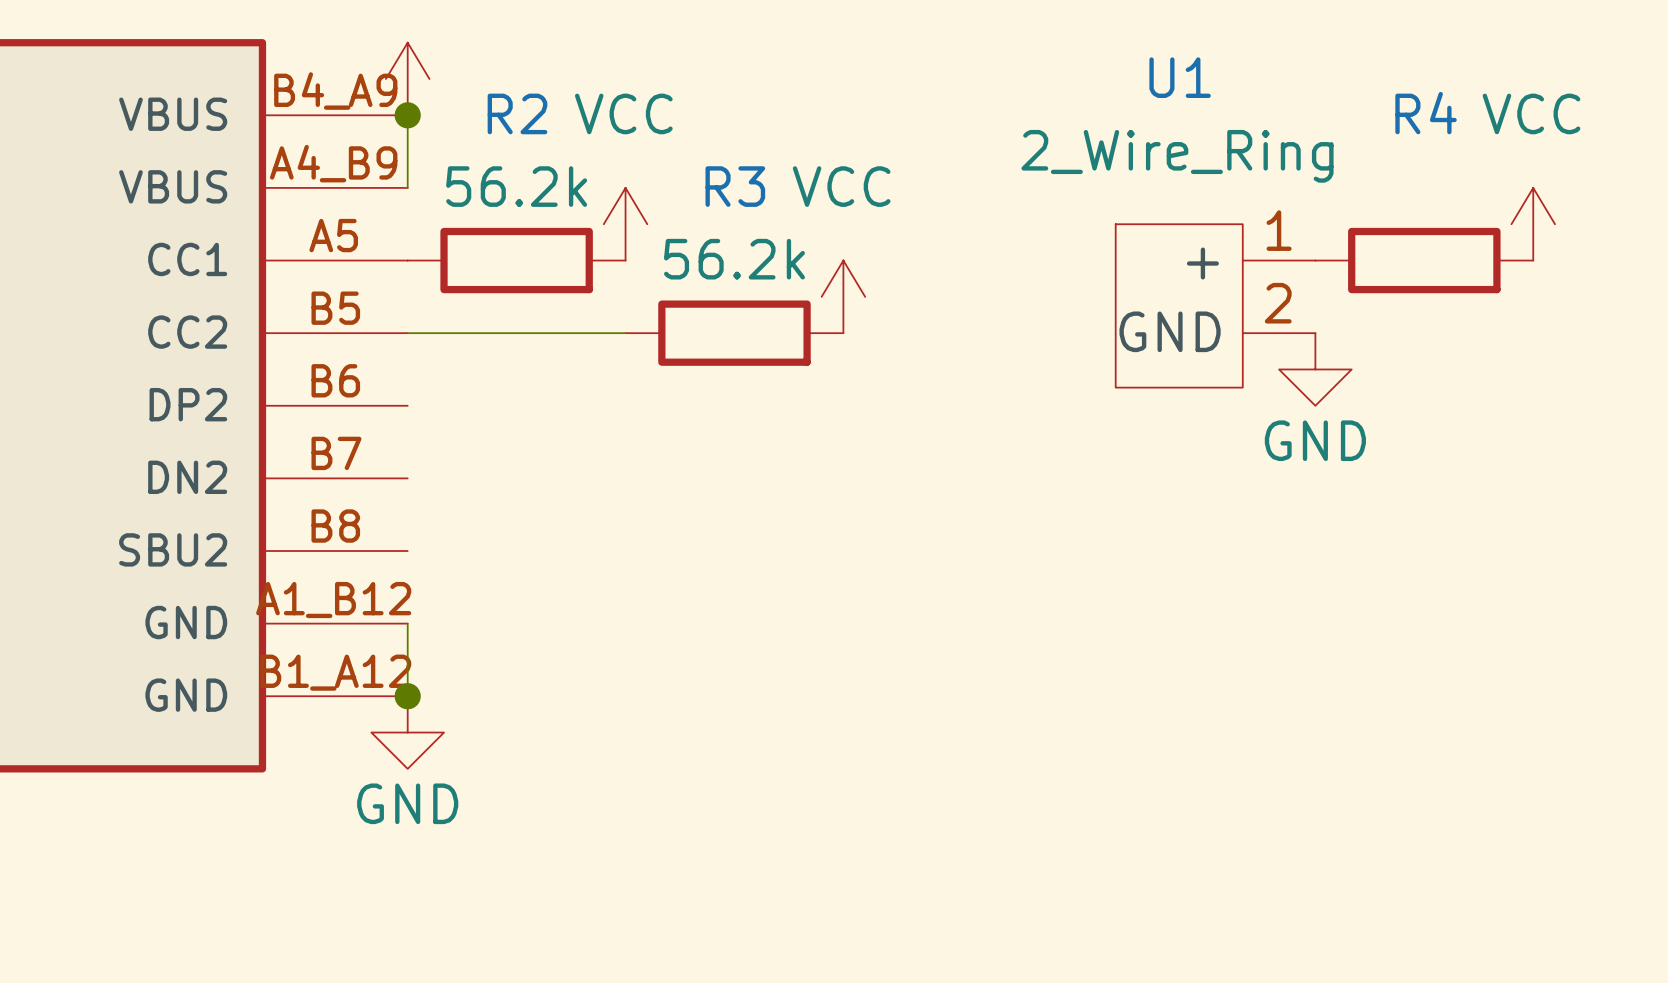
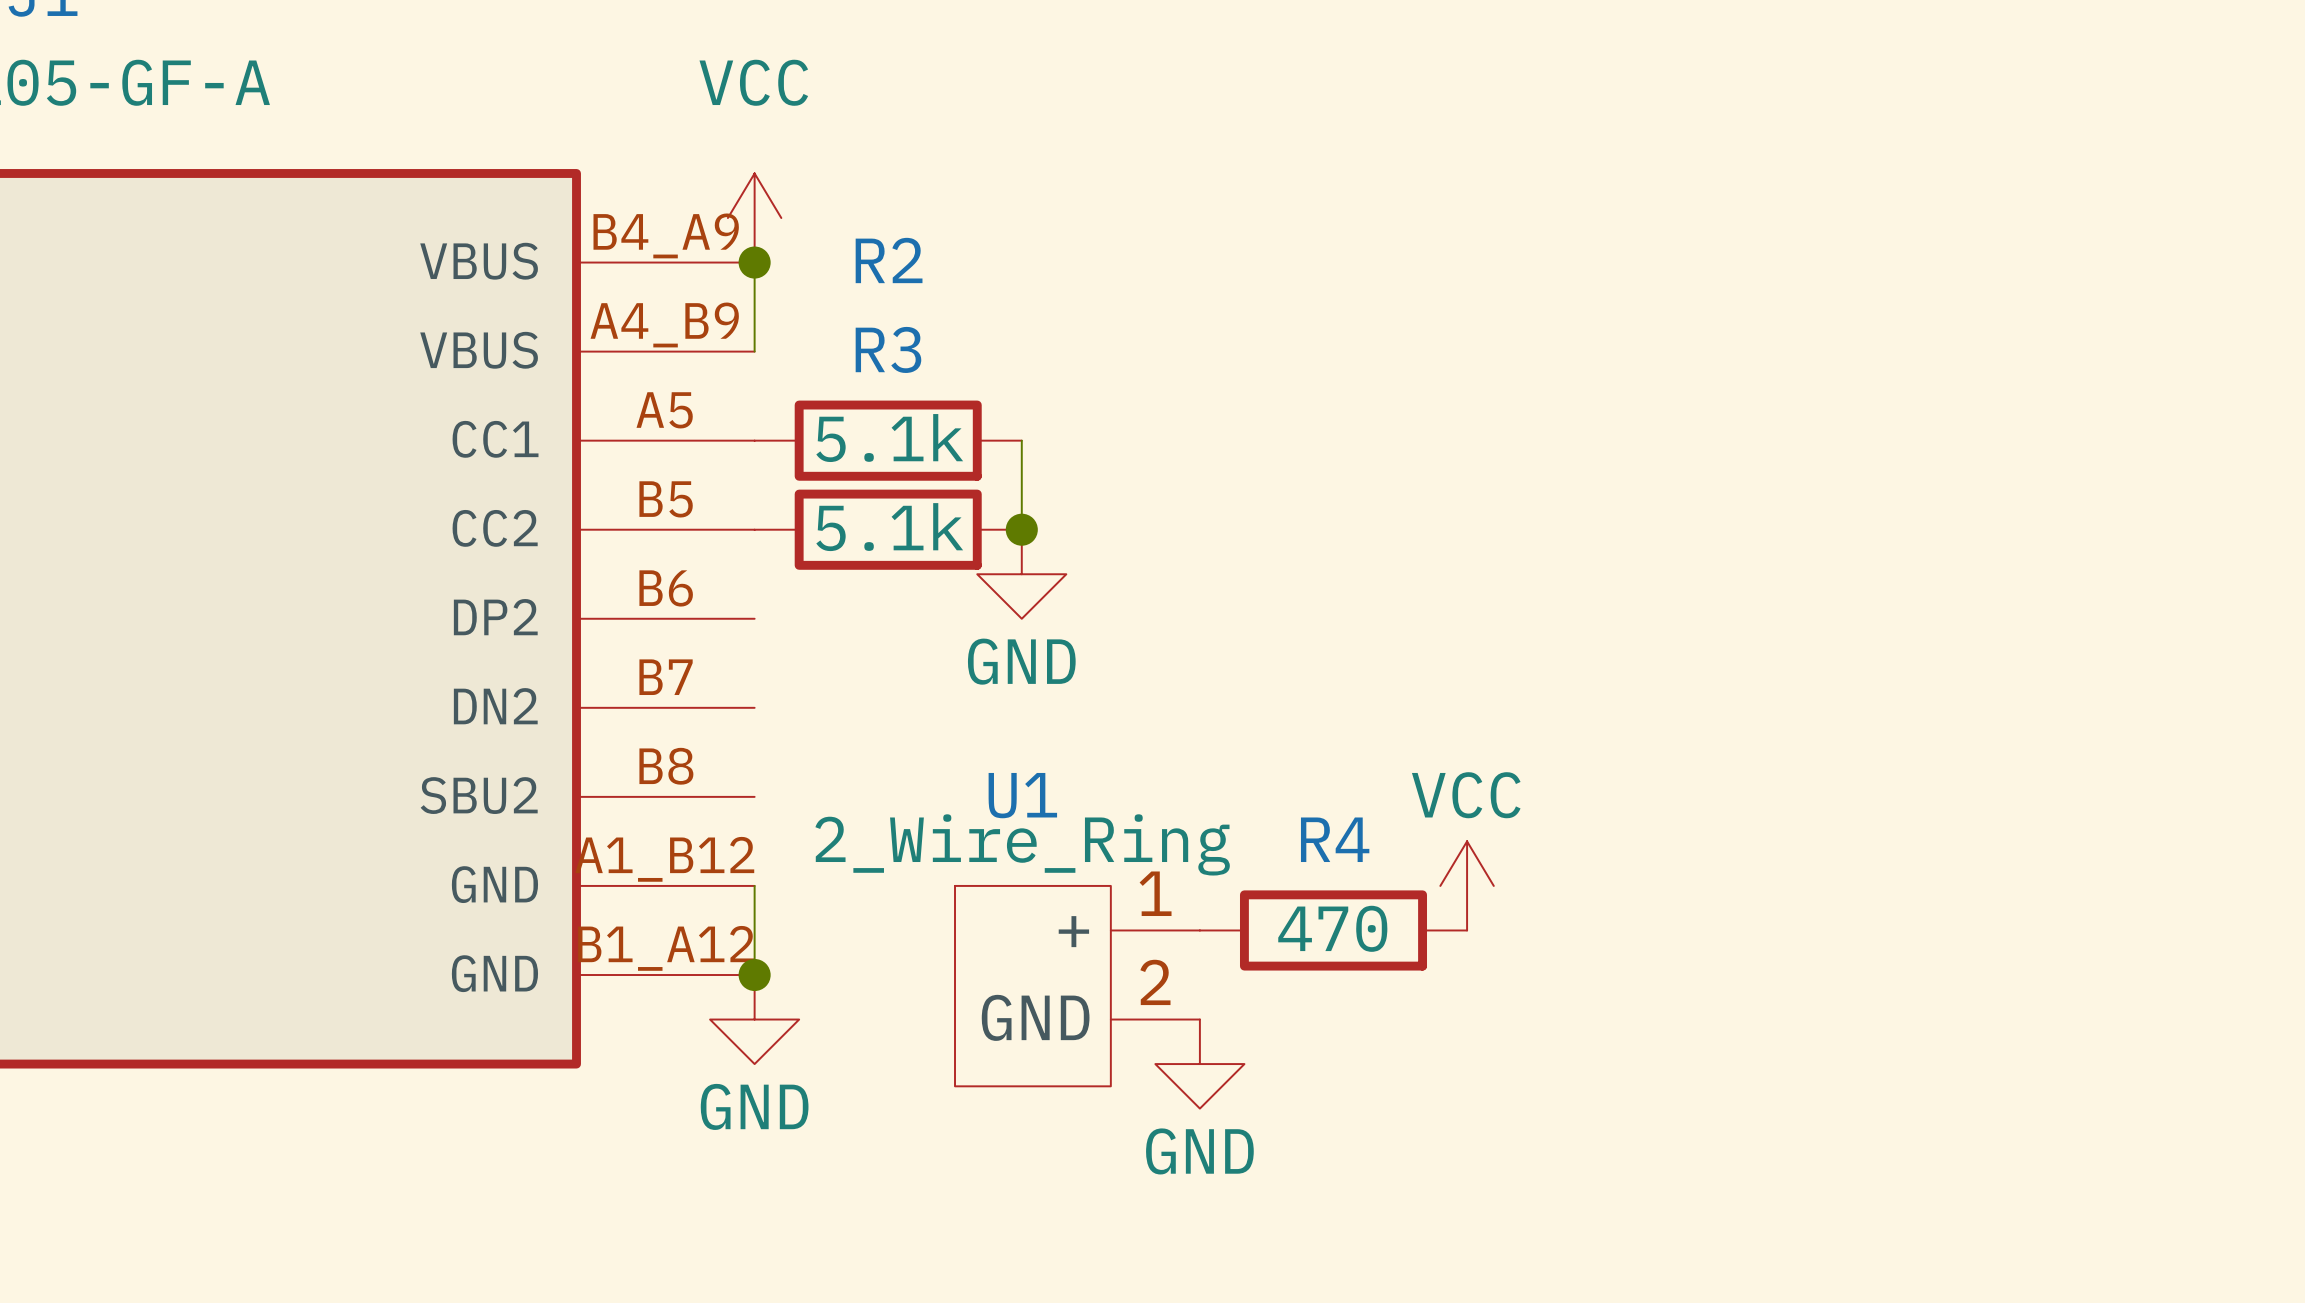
U1 name position: U1 (1180, 77) -> U1 (1022, 795)
R4 name position: R4 (1426, 113) -> R4 (1335, 839)
U1 value position: 2_Wire_Ring (1177, 156) -> 2_Wire_Ring (1022, 844)
R2 value: 56.2k (516, 186) -> 5.1k (889, 438)
power symbol: VCC (625, 224) -> none
power symbol: VCC (1533, 224) -> none
R3 value: 56.2k (734, 259) -> 5.1k (889, 527)
R4 position: (1424, 260) -> (1333, 930)
power symbol: VCC (843, 296) -> none
U1 position: (1215, 305) -> (1077, 986)
wire: (407, 333) (625, 333) -> (1021, 440) (1021, 529)
junction: none -> (1021, 529)
R3 position: (734, 333) -> (888, 529)
power symbol: none -> GND (1021, 574)
power symbol: GND (1315, 369) -> none
power symbol: none -> VCC (1467, 885)
R4 value: none -> 470 (1332, 928)
power symbol: none -> GND (1199, 1064)

